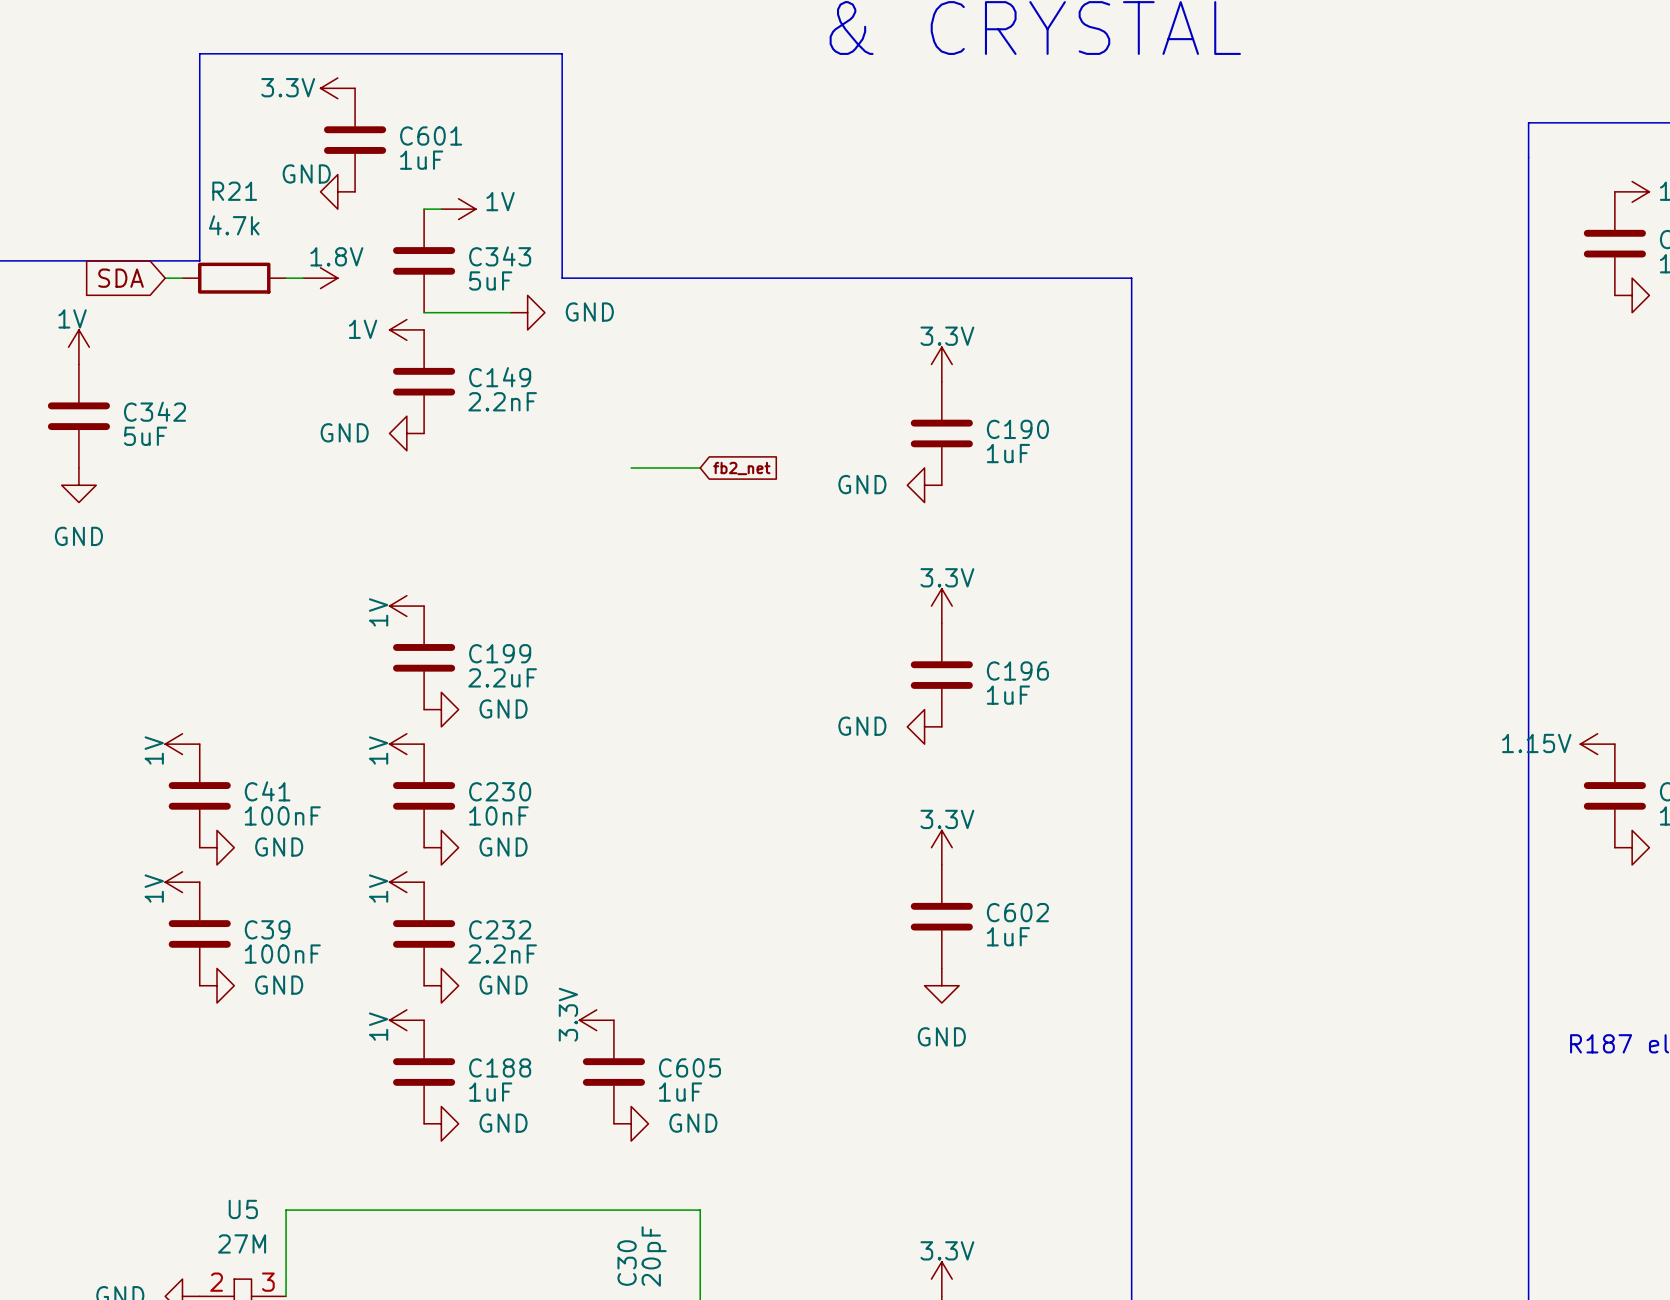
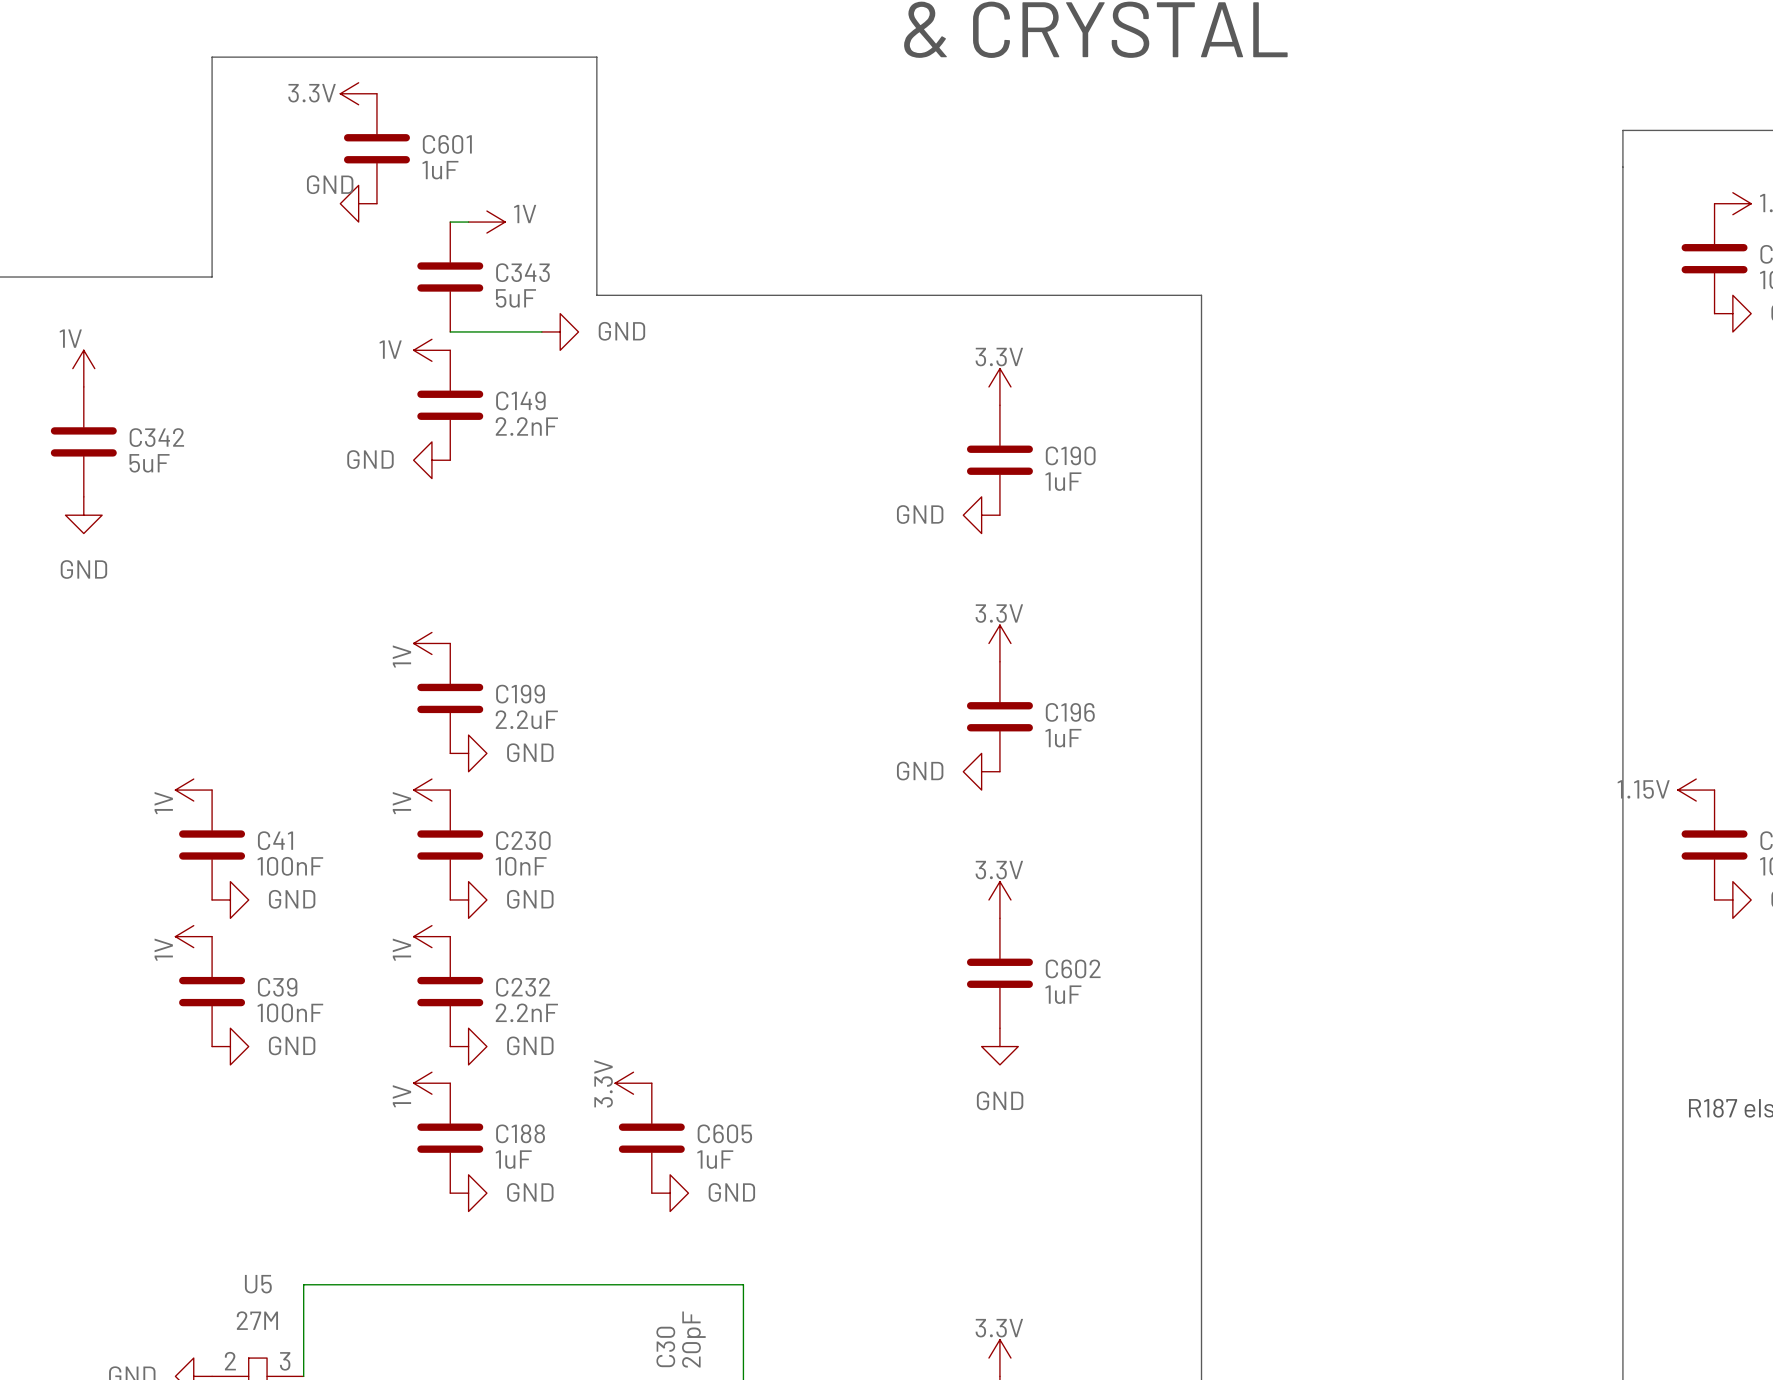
global label: SDA (121, 278) -> none
wire: (165, 278) (182, 278) -> none
R21: 4.7k (234, 278) -> none
wire: (286, 278) (303, 278) -> none
power symbol: 1.8V (320, 278) -> none
wire: (631, 468) (700, 468) -> none
global label: fb2_net (741, 468) -> none

